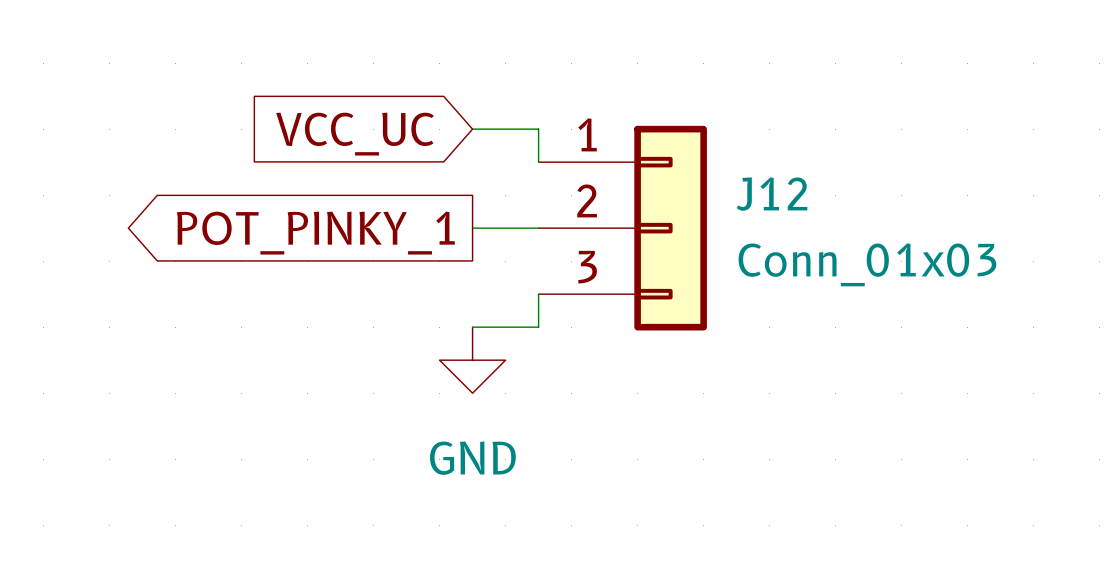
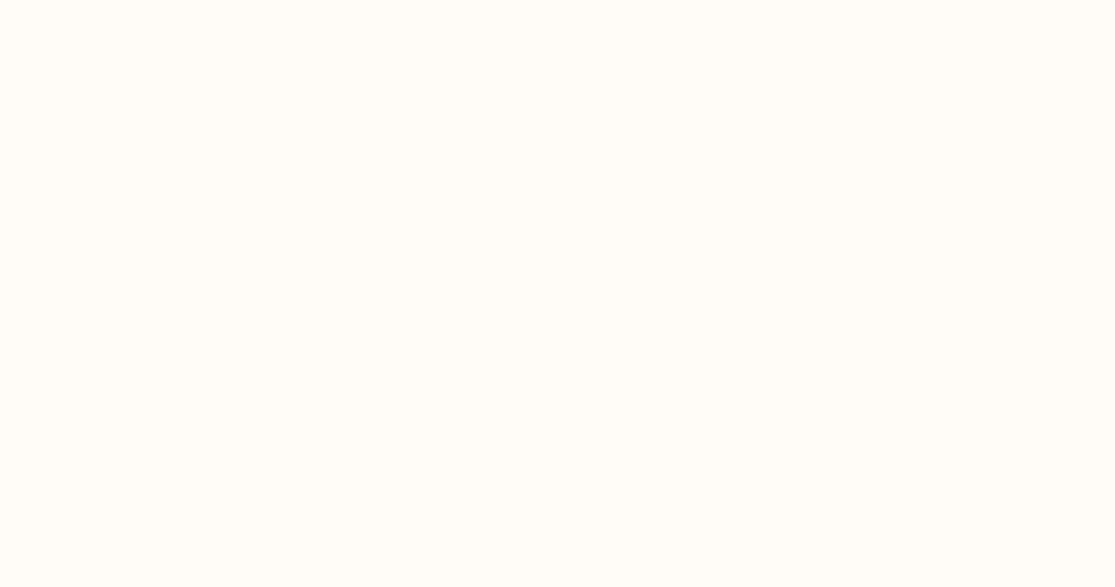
wire: (472, 129) (538, 129) (538, 162) -> none
global label: VCC_UC (354, 134) -> none
wire: (472, 228) (538, 228) -> none
J12: Conn_01x03 (622, 228) -> none
global label: POT_PINKY_1 (315, 233) -> none
wire: (538, 294) (538, 327) (472, 327) -> none
power symbol: GND (472, 360) -> none

